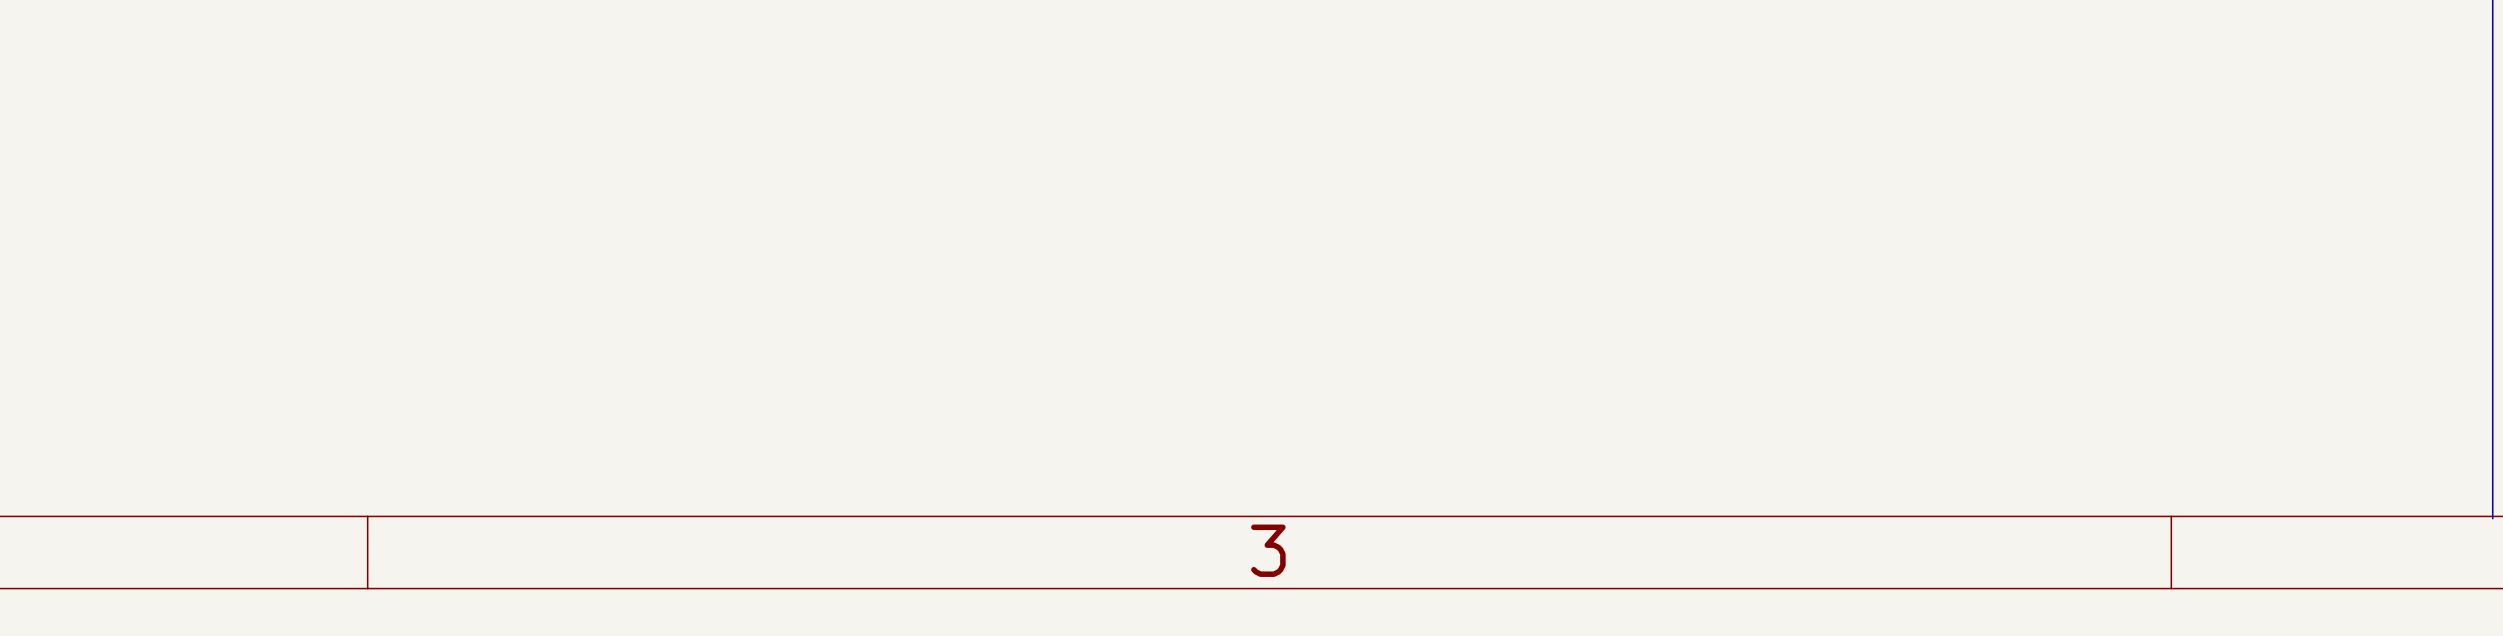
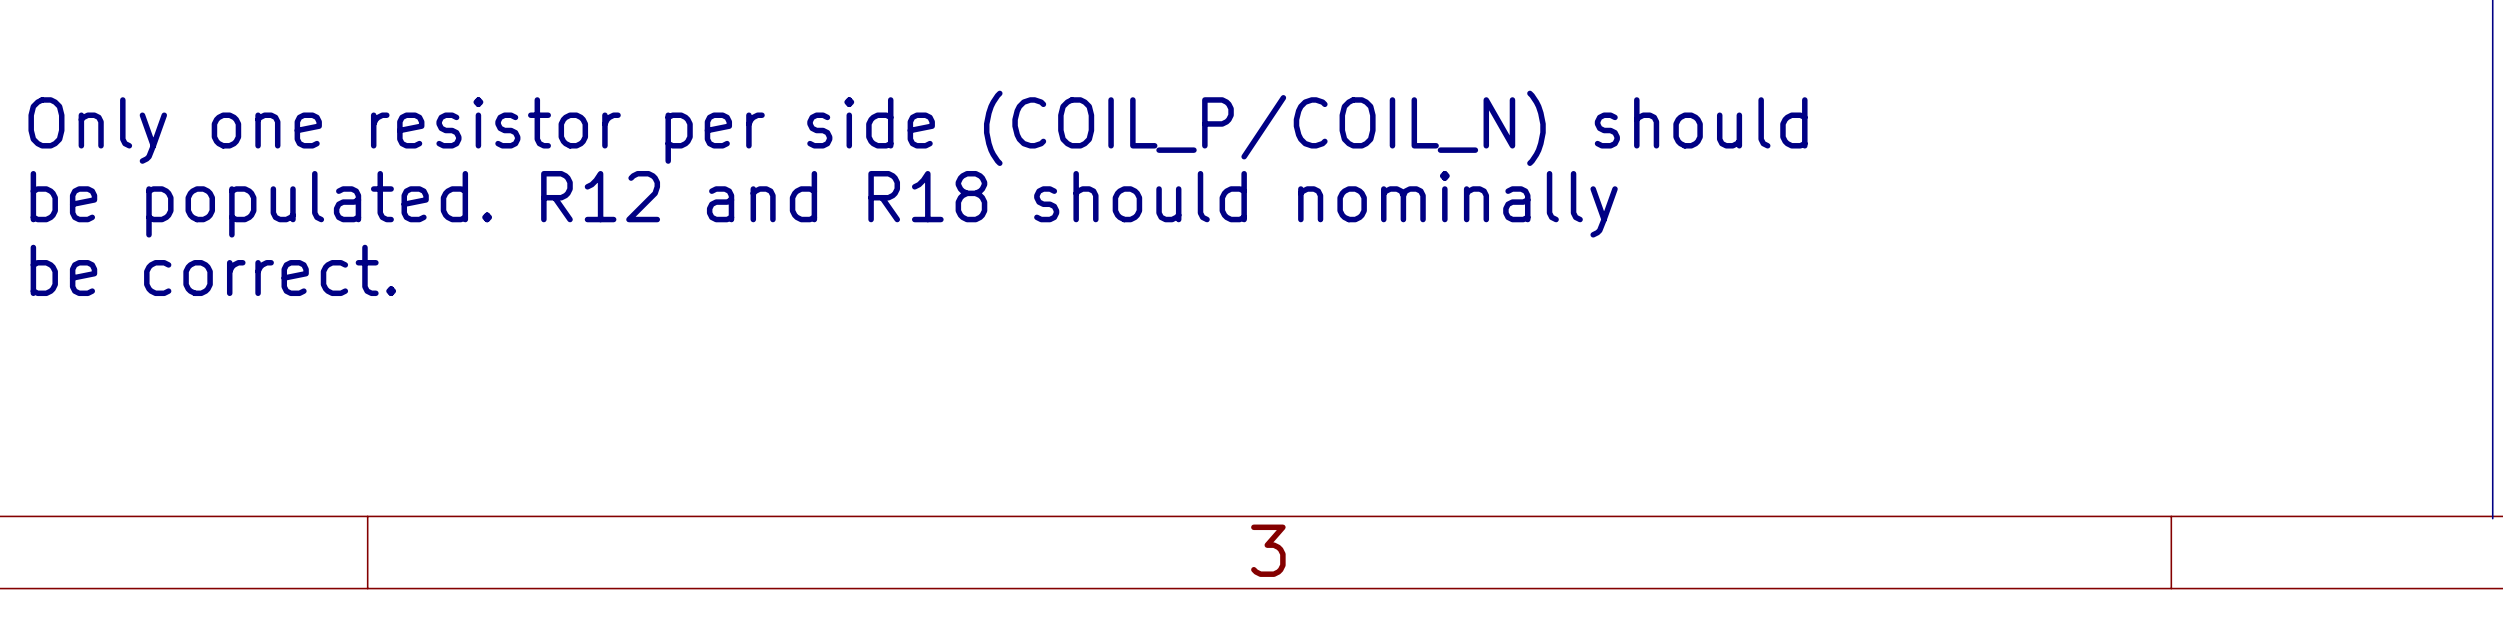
text: none -> Only one resistor per side (COIL_P/COIL_N) should (917, 128)
text: none -> be populated. R12 and R18 should nominally (824, 204)
text: none -> be correct. (213, 270)

